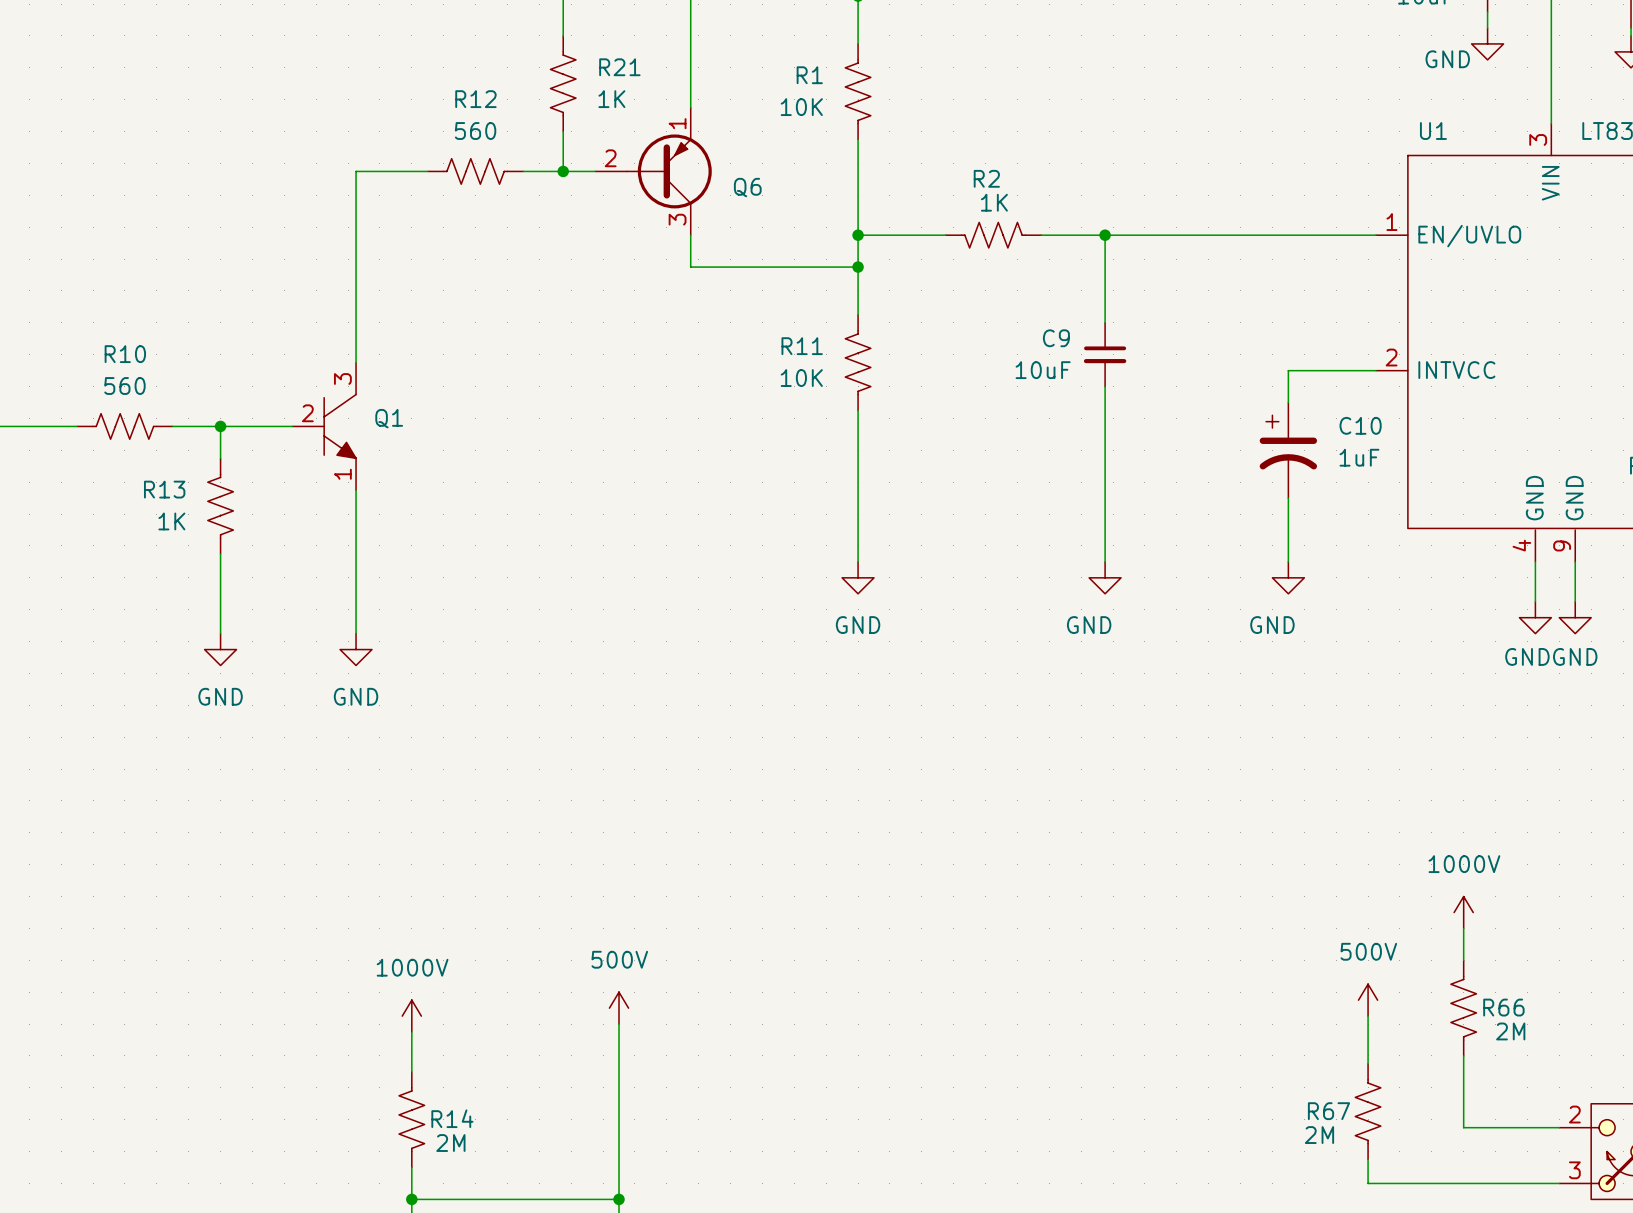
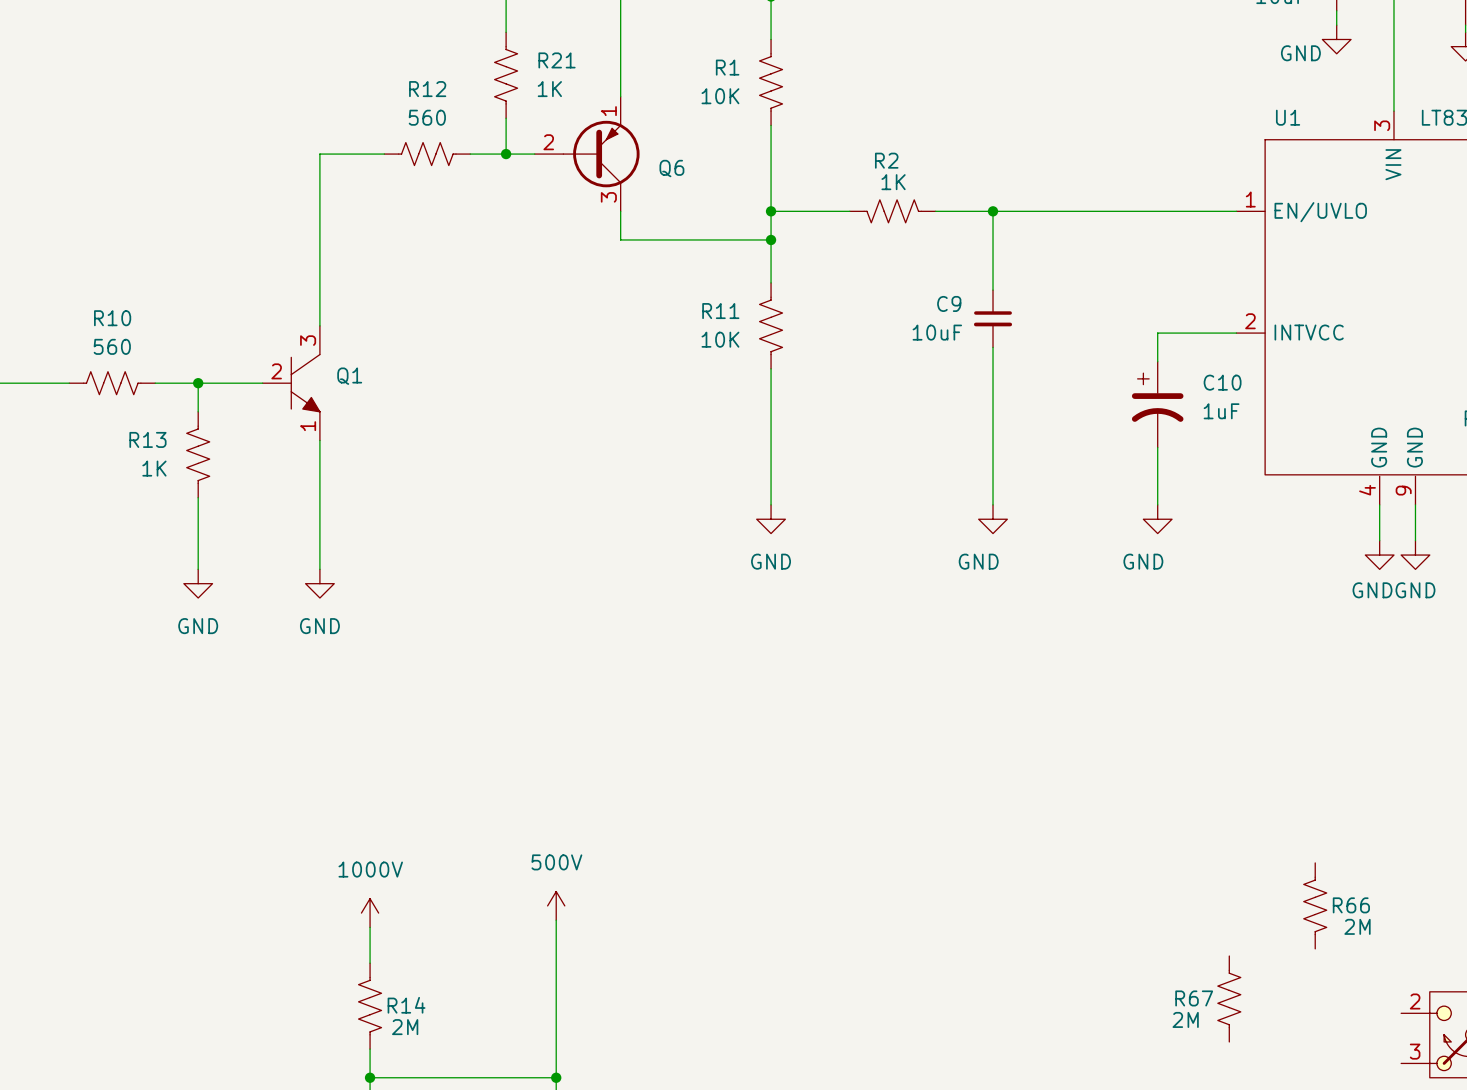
power symbol: 1000V (1463, 912) -> none
wire: (1463, 928) (1463, 960) -> none
power symbol: 500V (1368, 1000) -> none
wire: (1368, 1016) (1368, 1063) -> none
wire: (1463, 1055) (1463, 1127) (1559, 1127) -> none
wire: (1368, 1159) (1368, 1183) (1559, 1183) -> none

